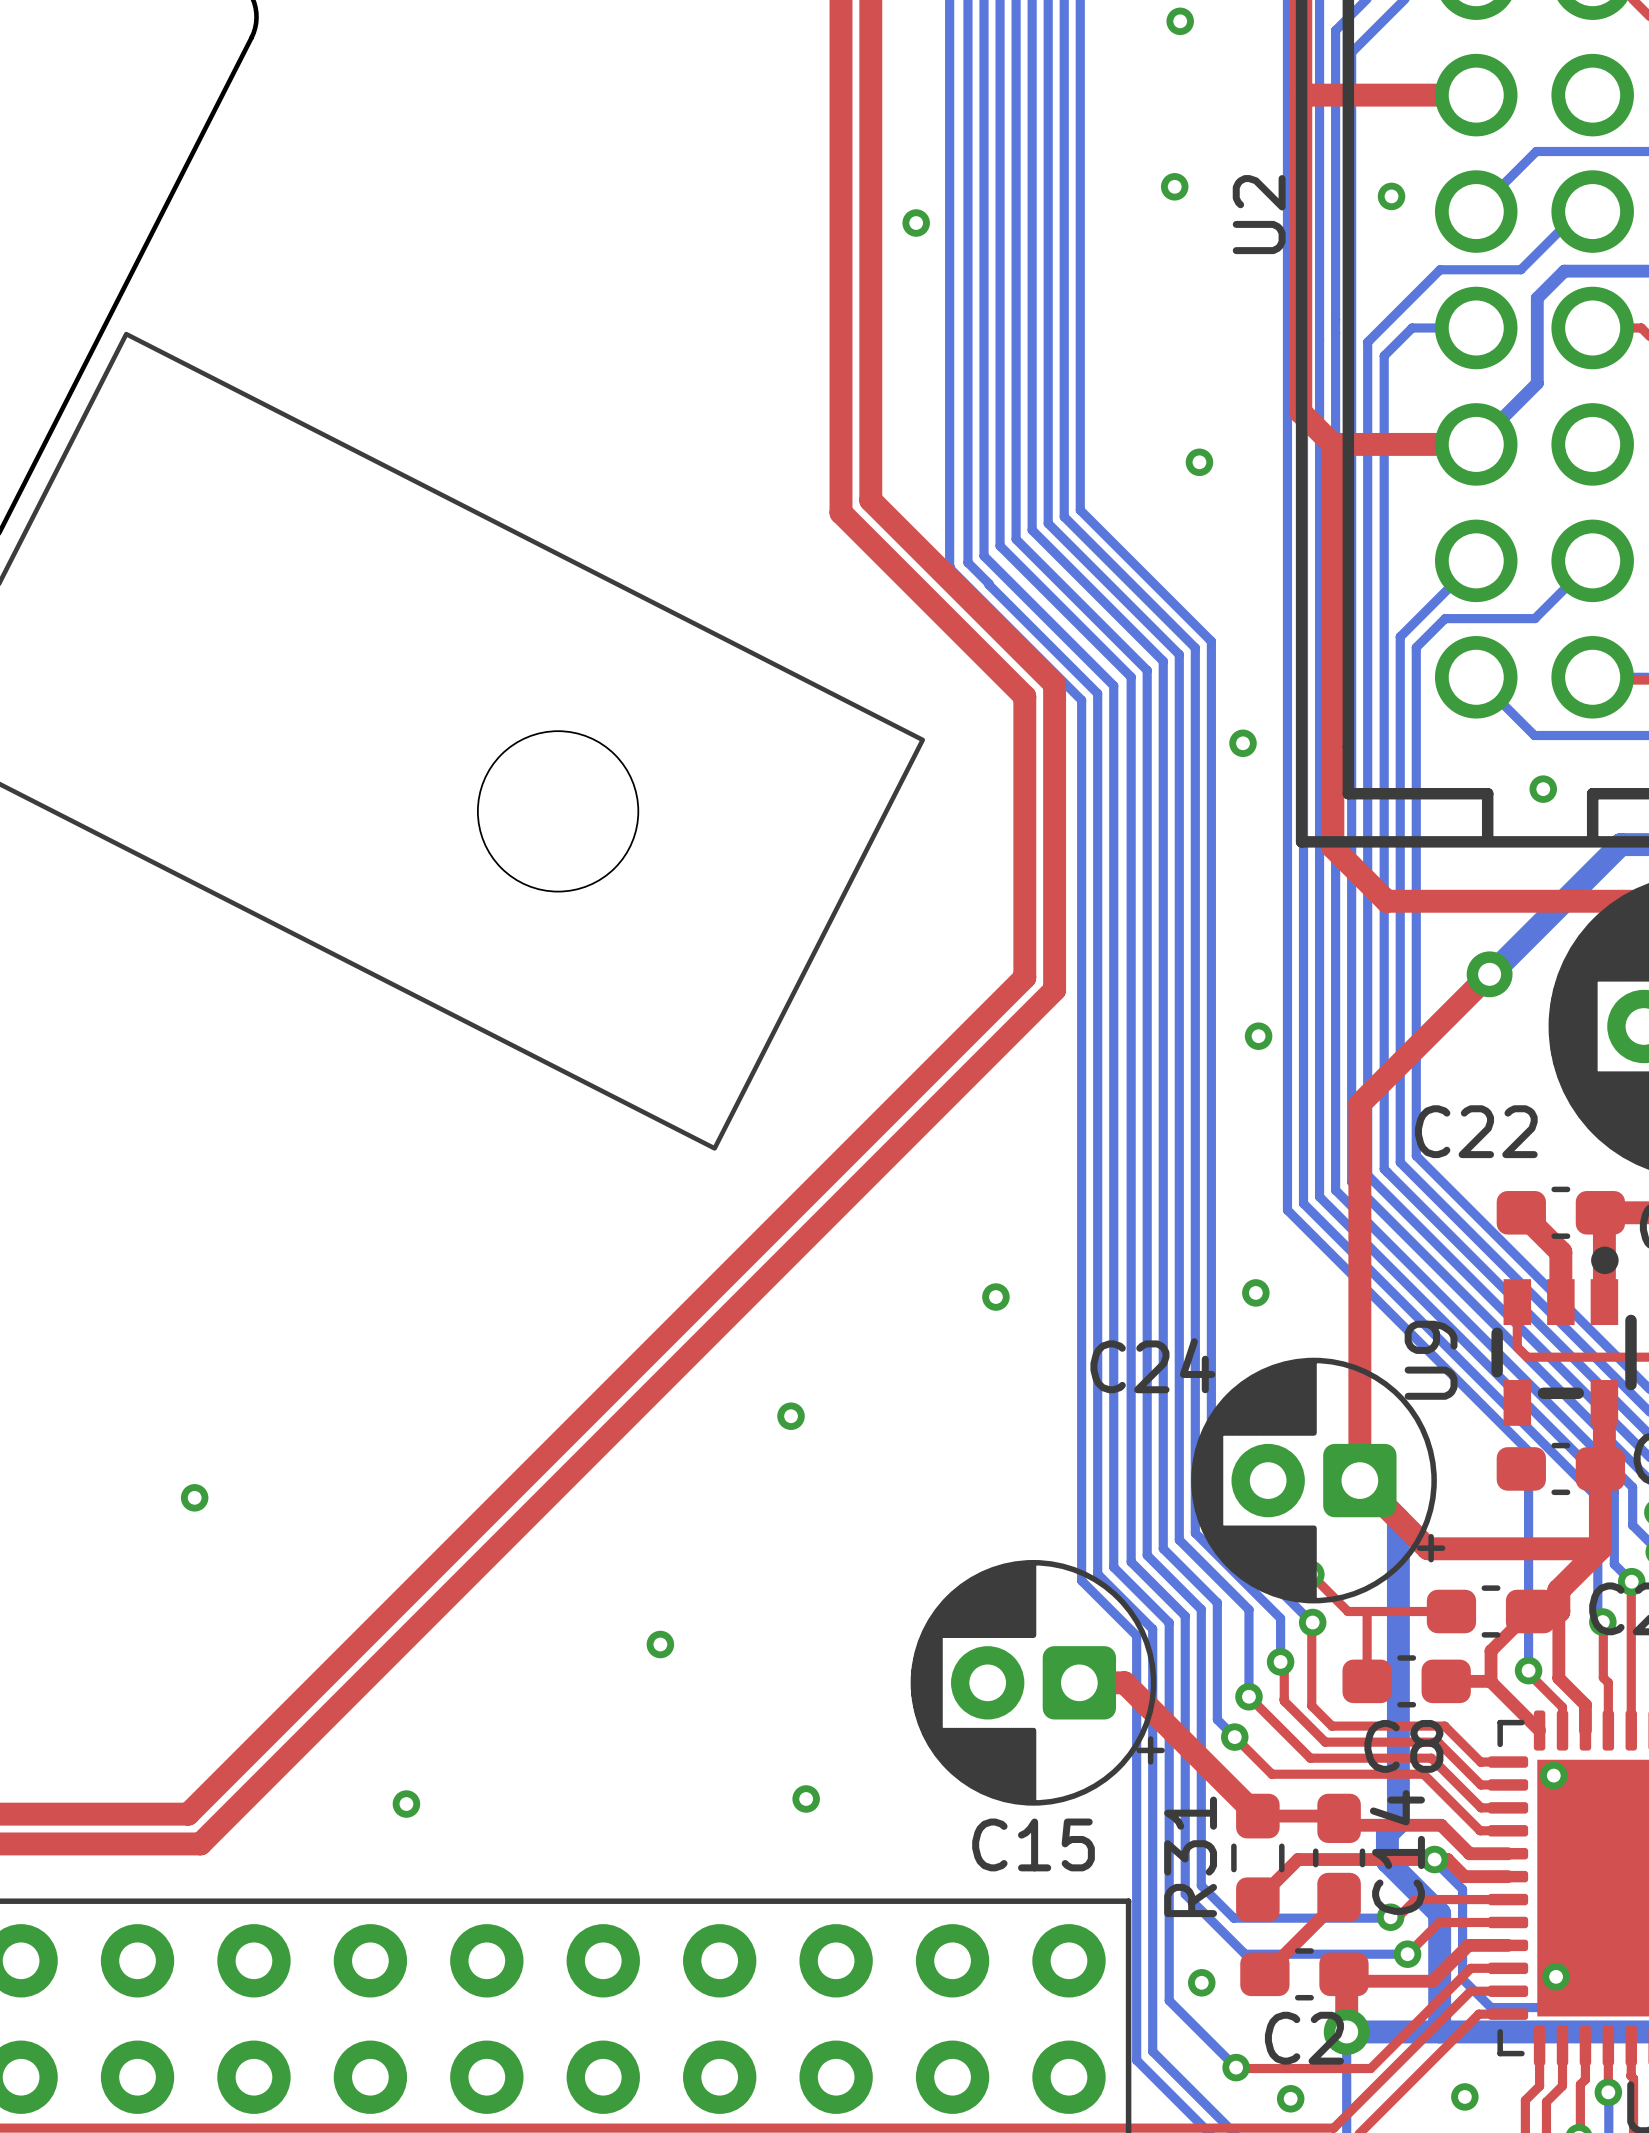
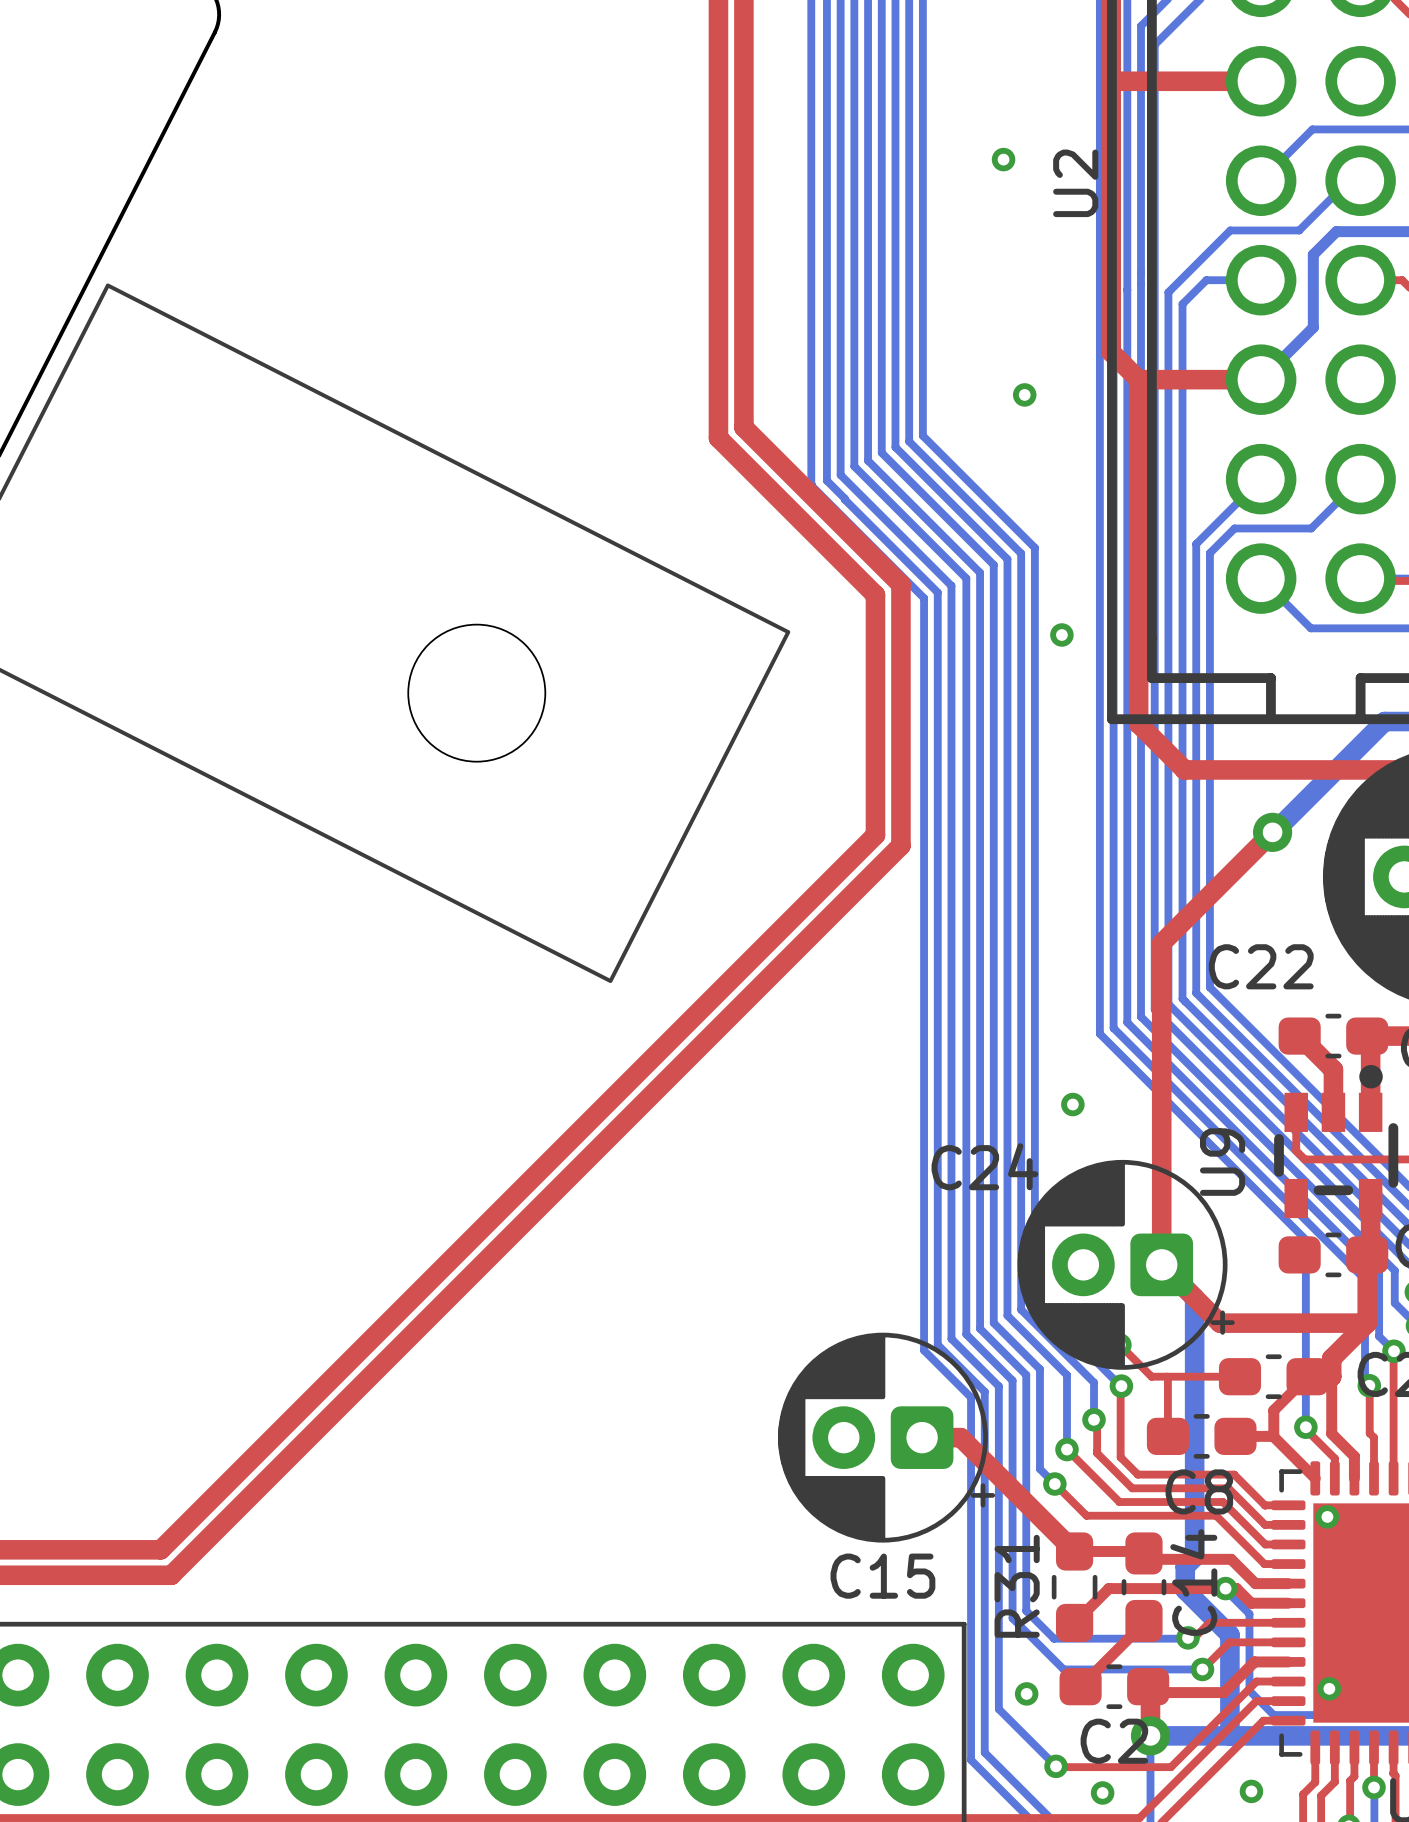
via: (1180, 21) -> none
via: (1391, 196) -> none
via: (916, 223) -> none
via: (1543, 789) -> none
via: (1258, 1036) -> none
via: (995, 1297) -> none
via: (791, 1416) -> none
via: (194, 1497) -> none
via: (660, 1644) -> none
via: (806, 1798) -> none
via: (406, 1804) -> none

